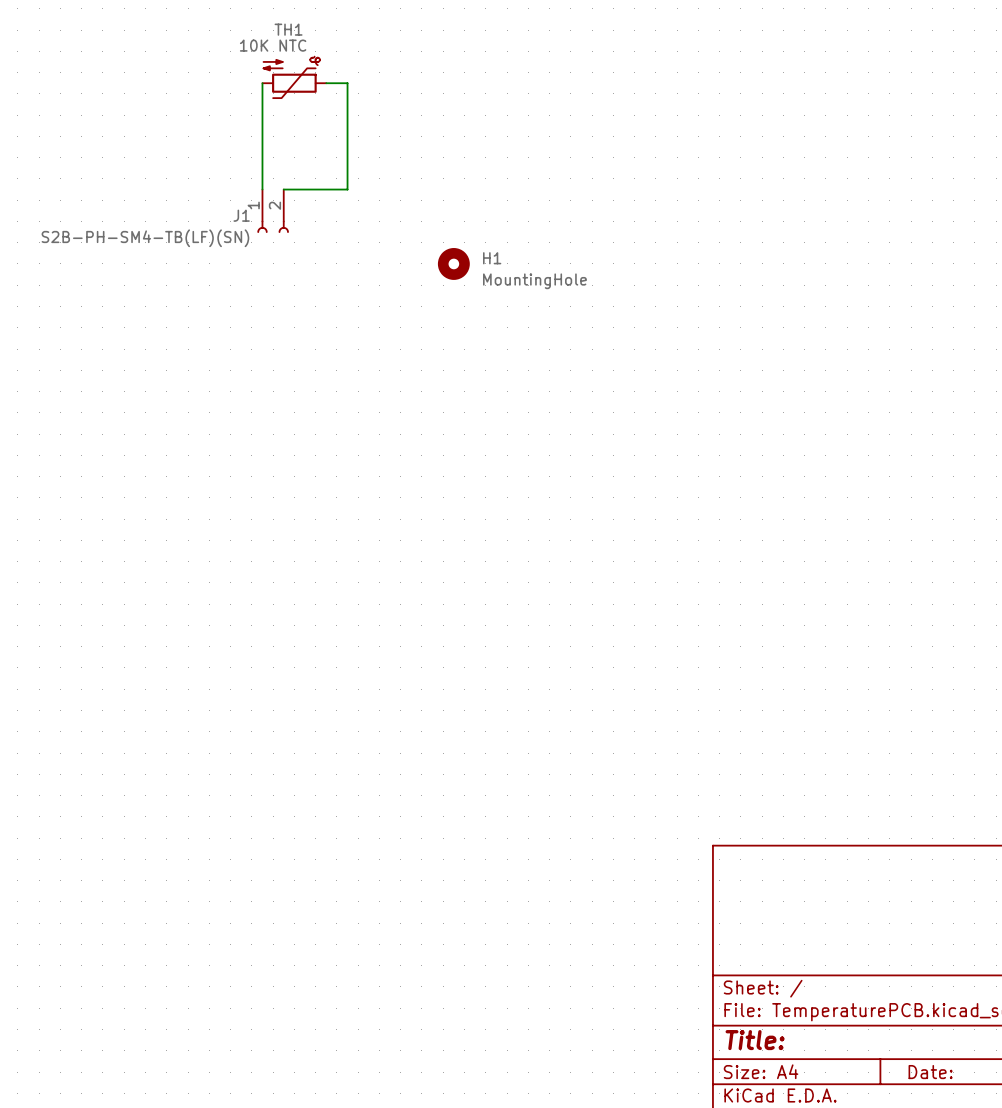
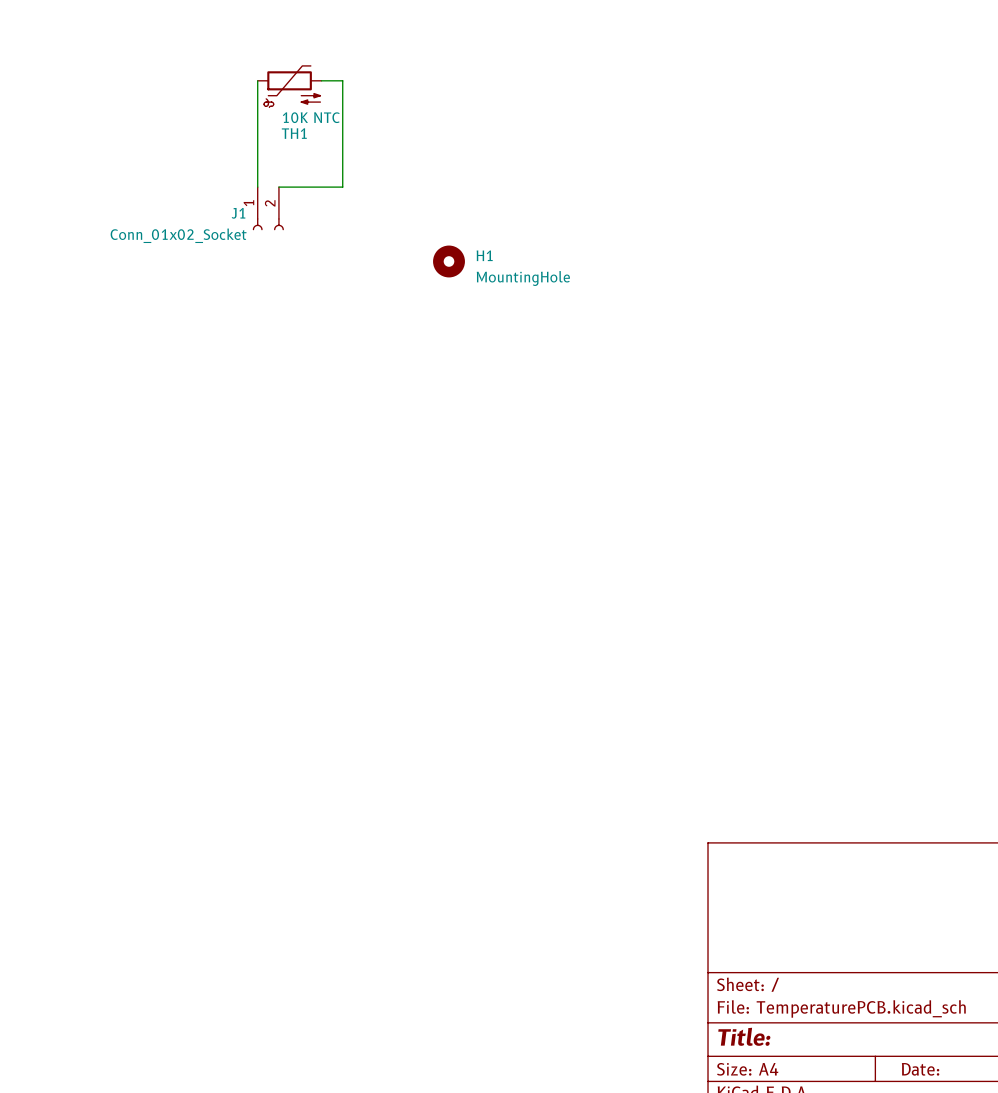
TH1 rotation: 0° (291, 77) -> 180° (292, 86)
J1 value: S2B-PH-SM4-TB(LF)(SN) (145, 238) -> Conn_01x02_Socket (178, 235)

